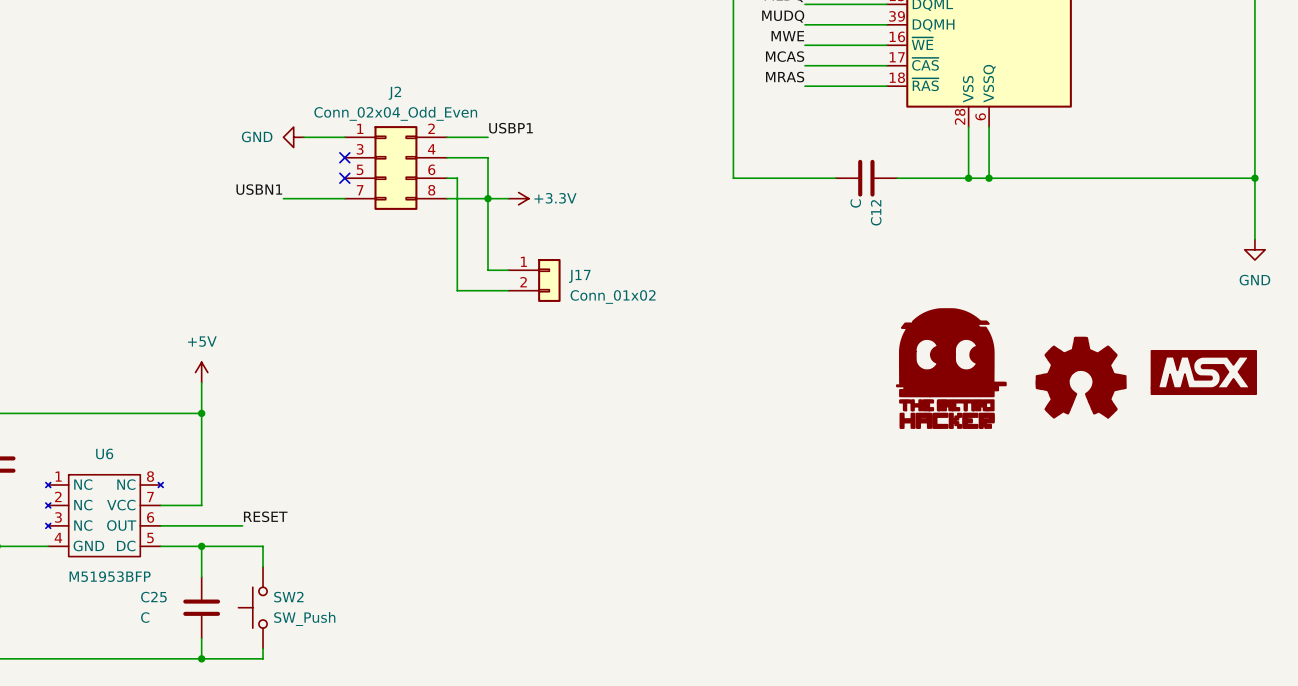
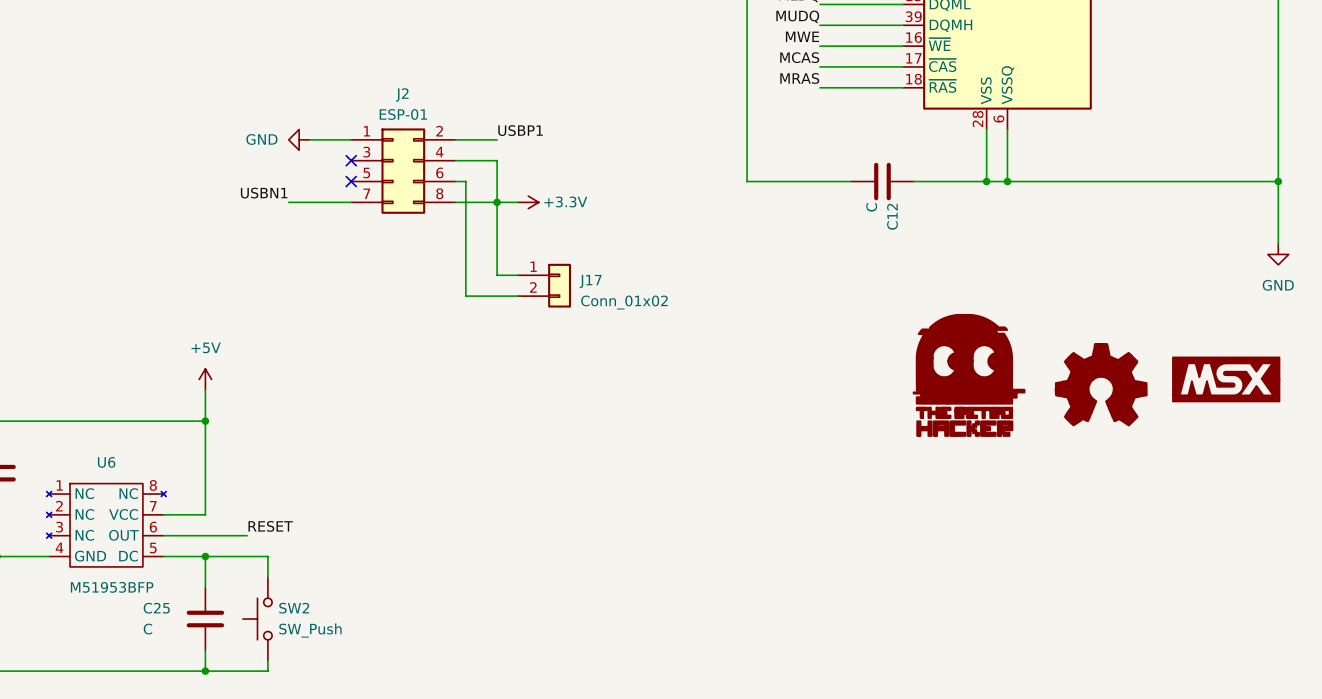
J2 value: Conn_02x04_Odd_Even (395, 113) -> ESP-01 (403, 114)

